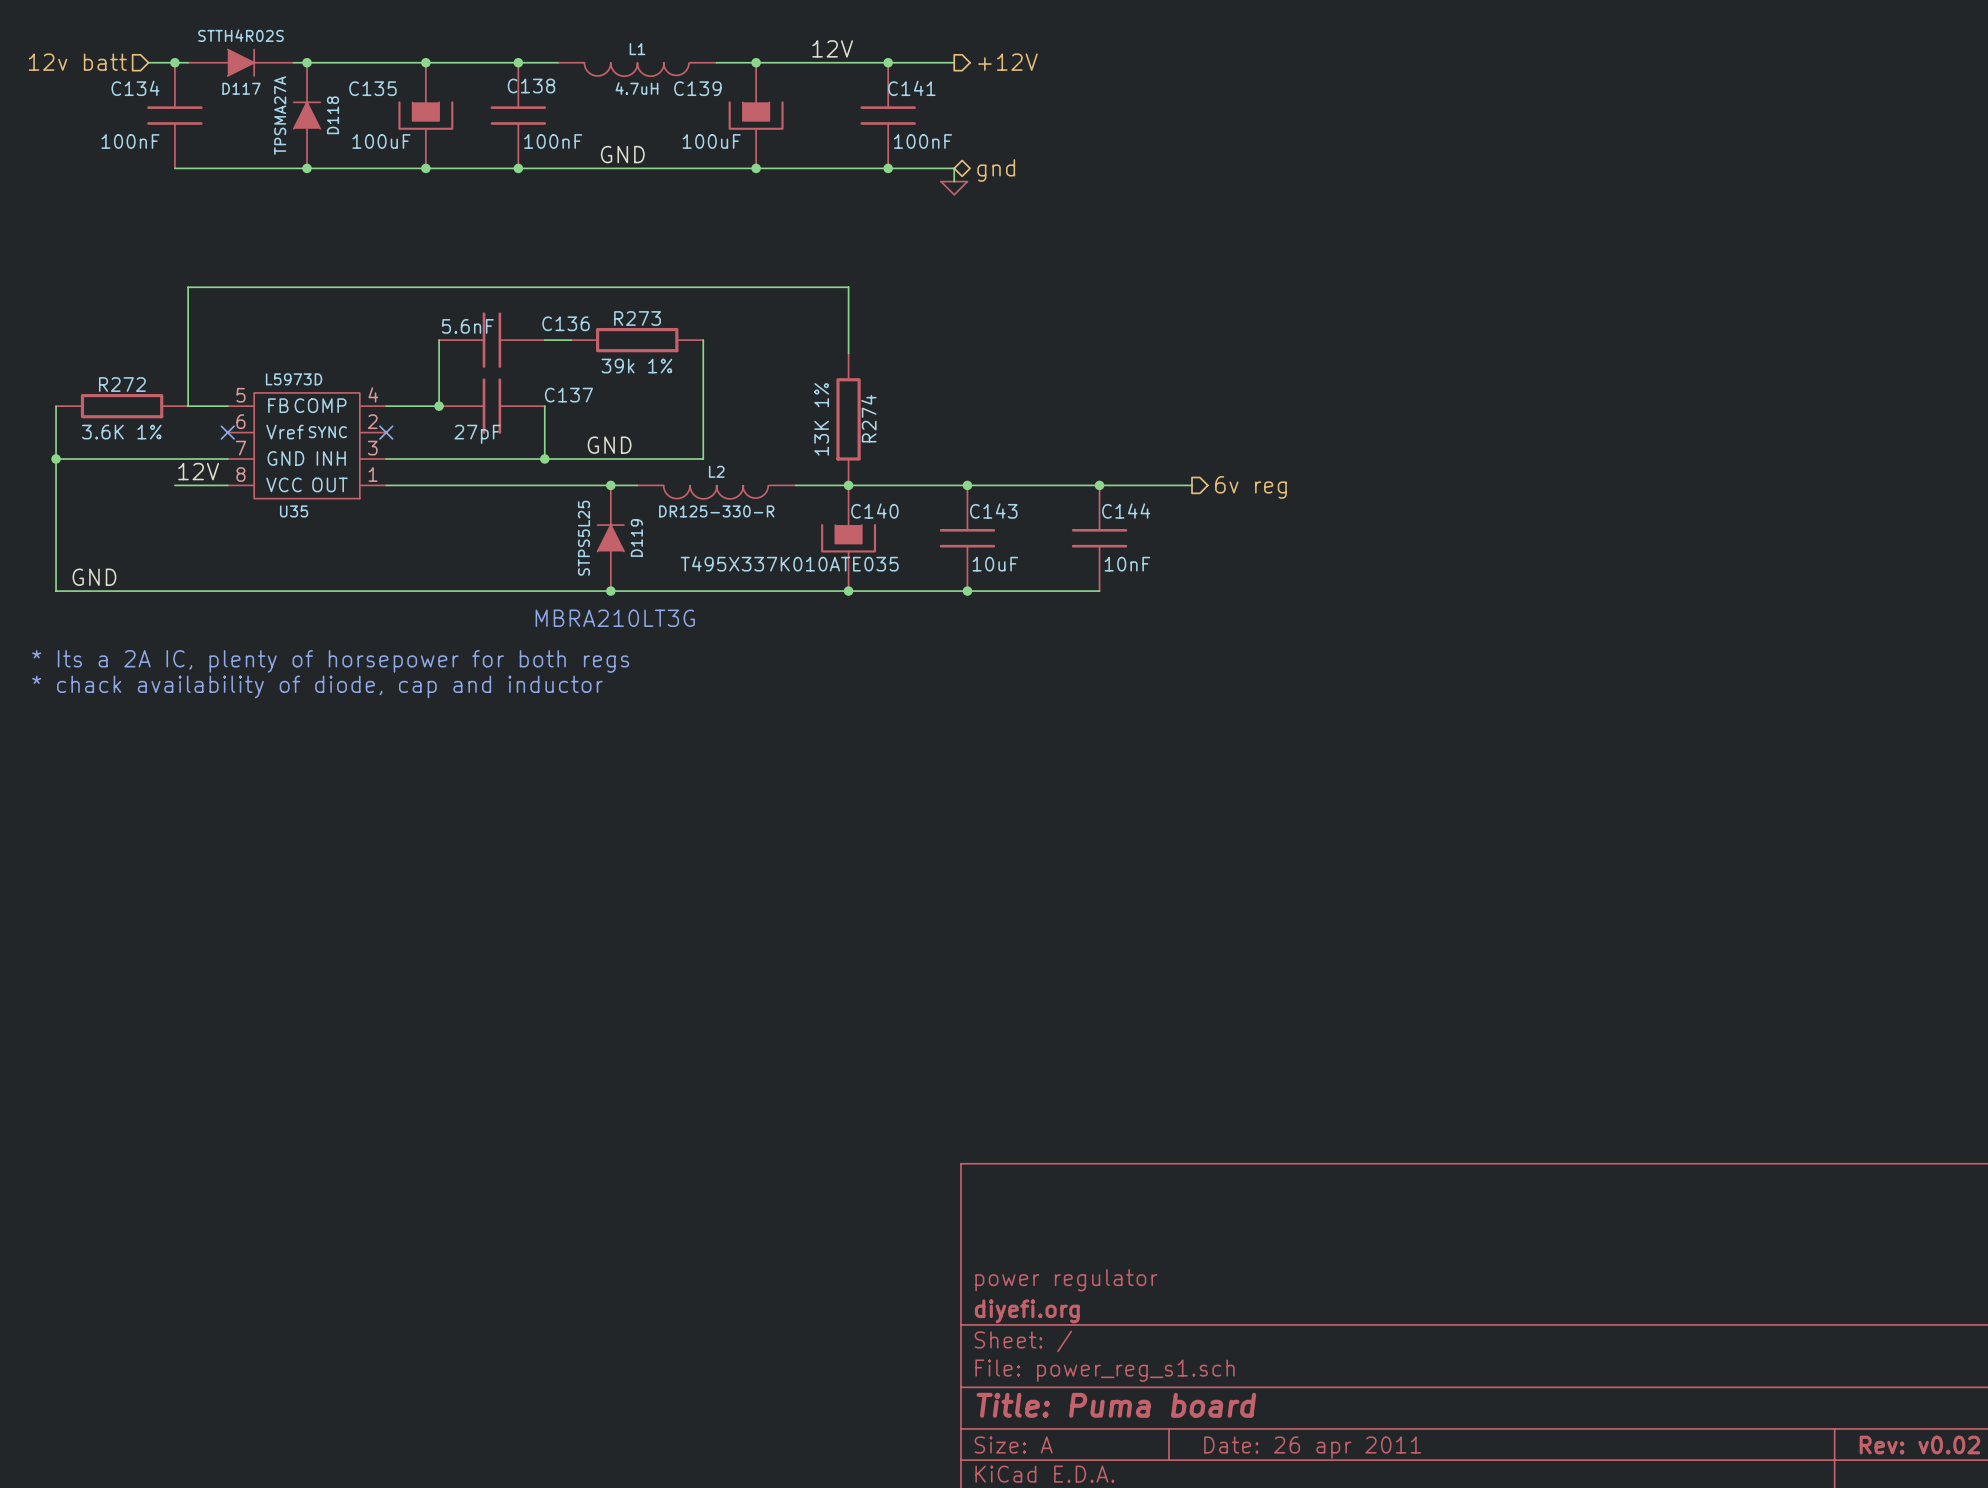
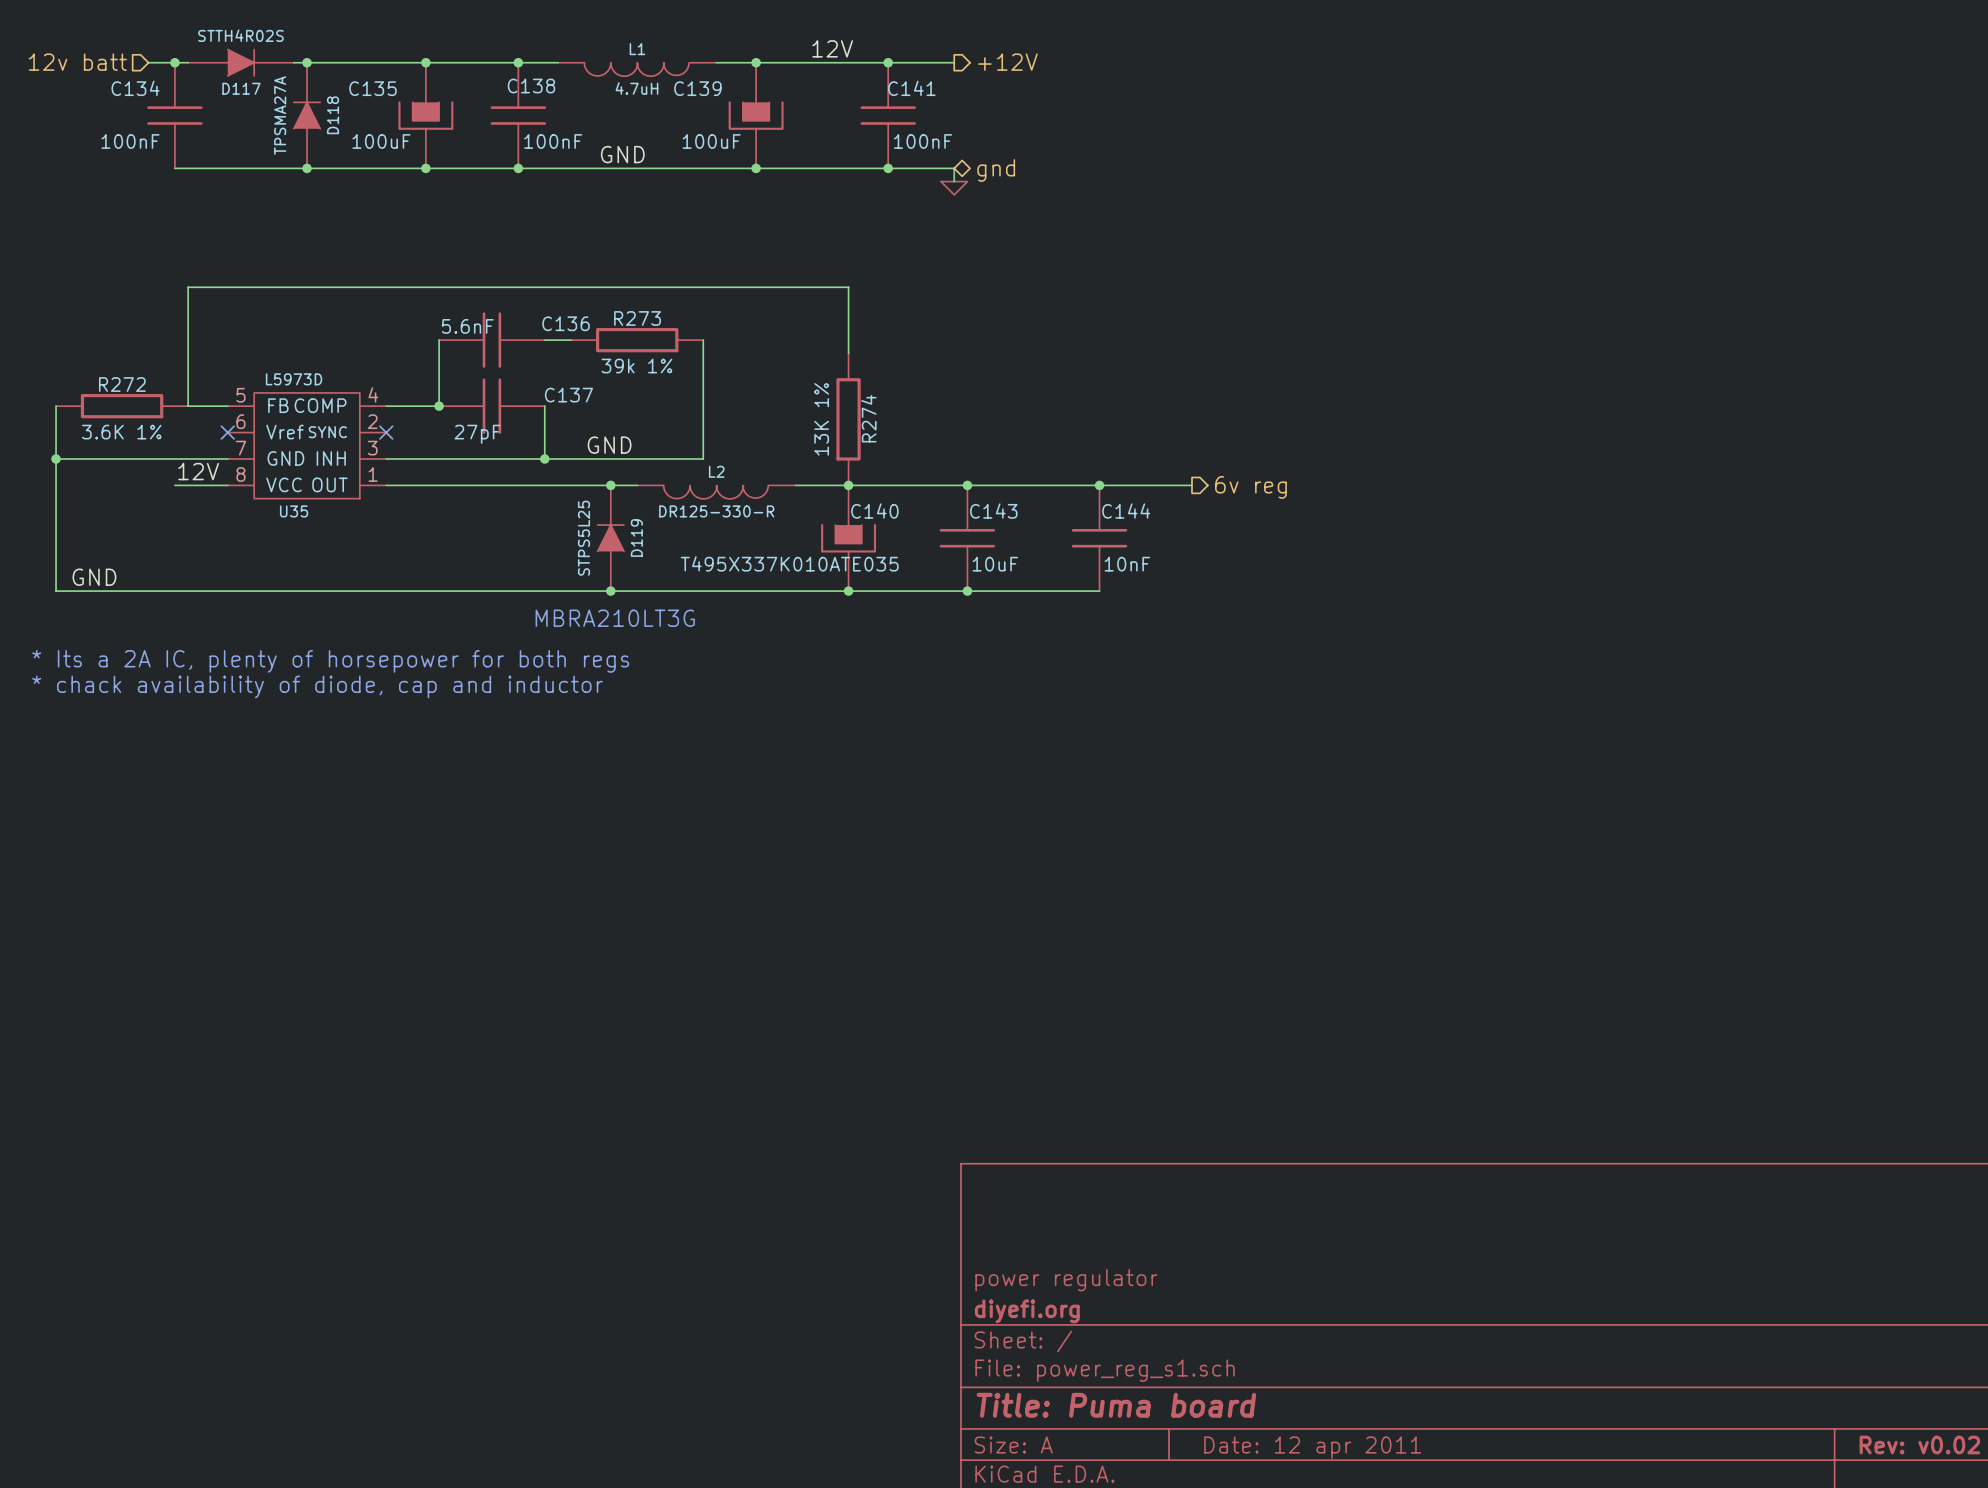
title block: Date: 26 apr 2011 (1312, 1447) -> Date: 12 apr 2011 (1312, 1447)

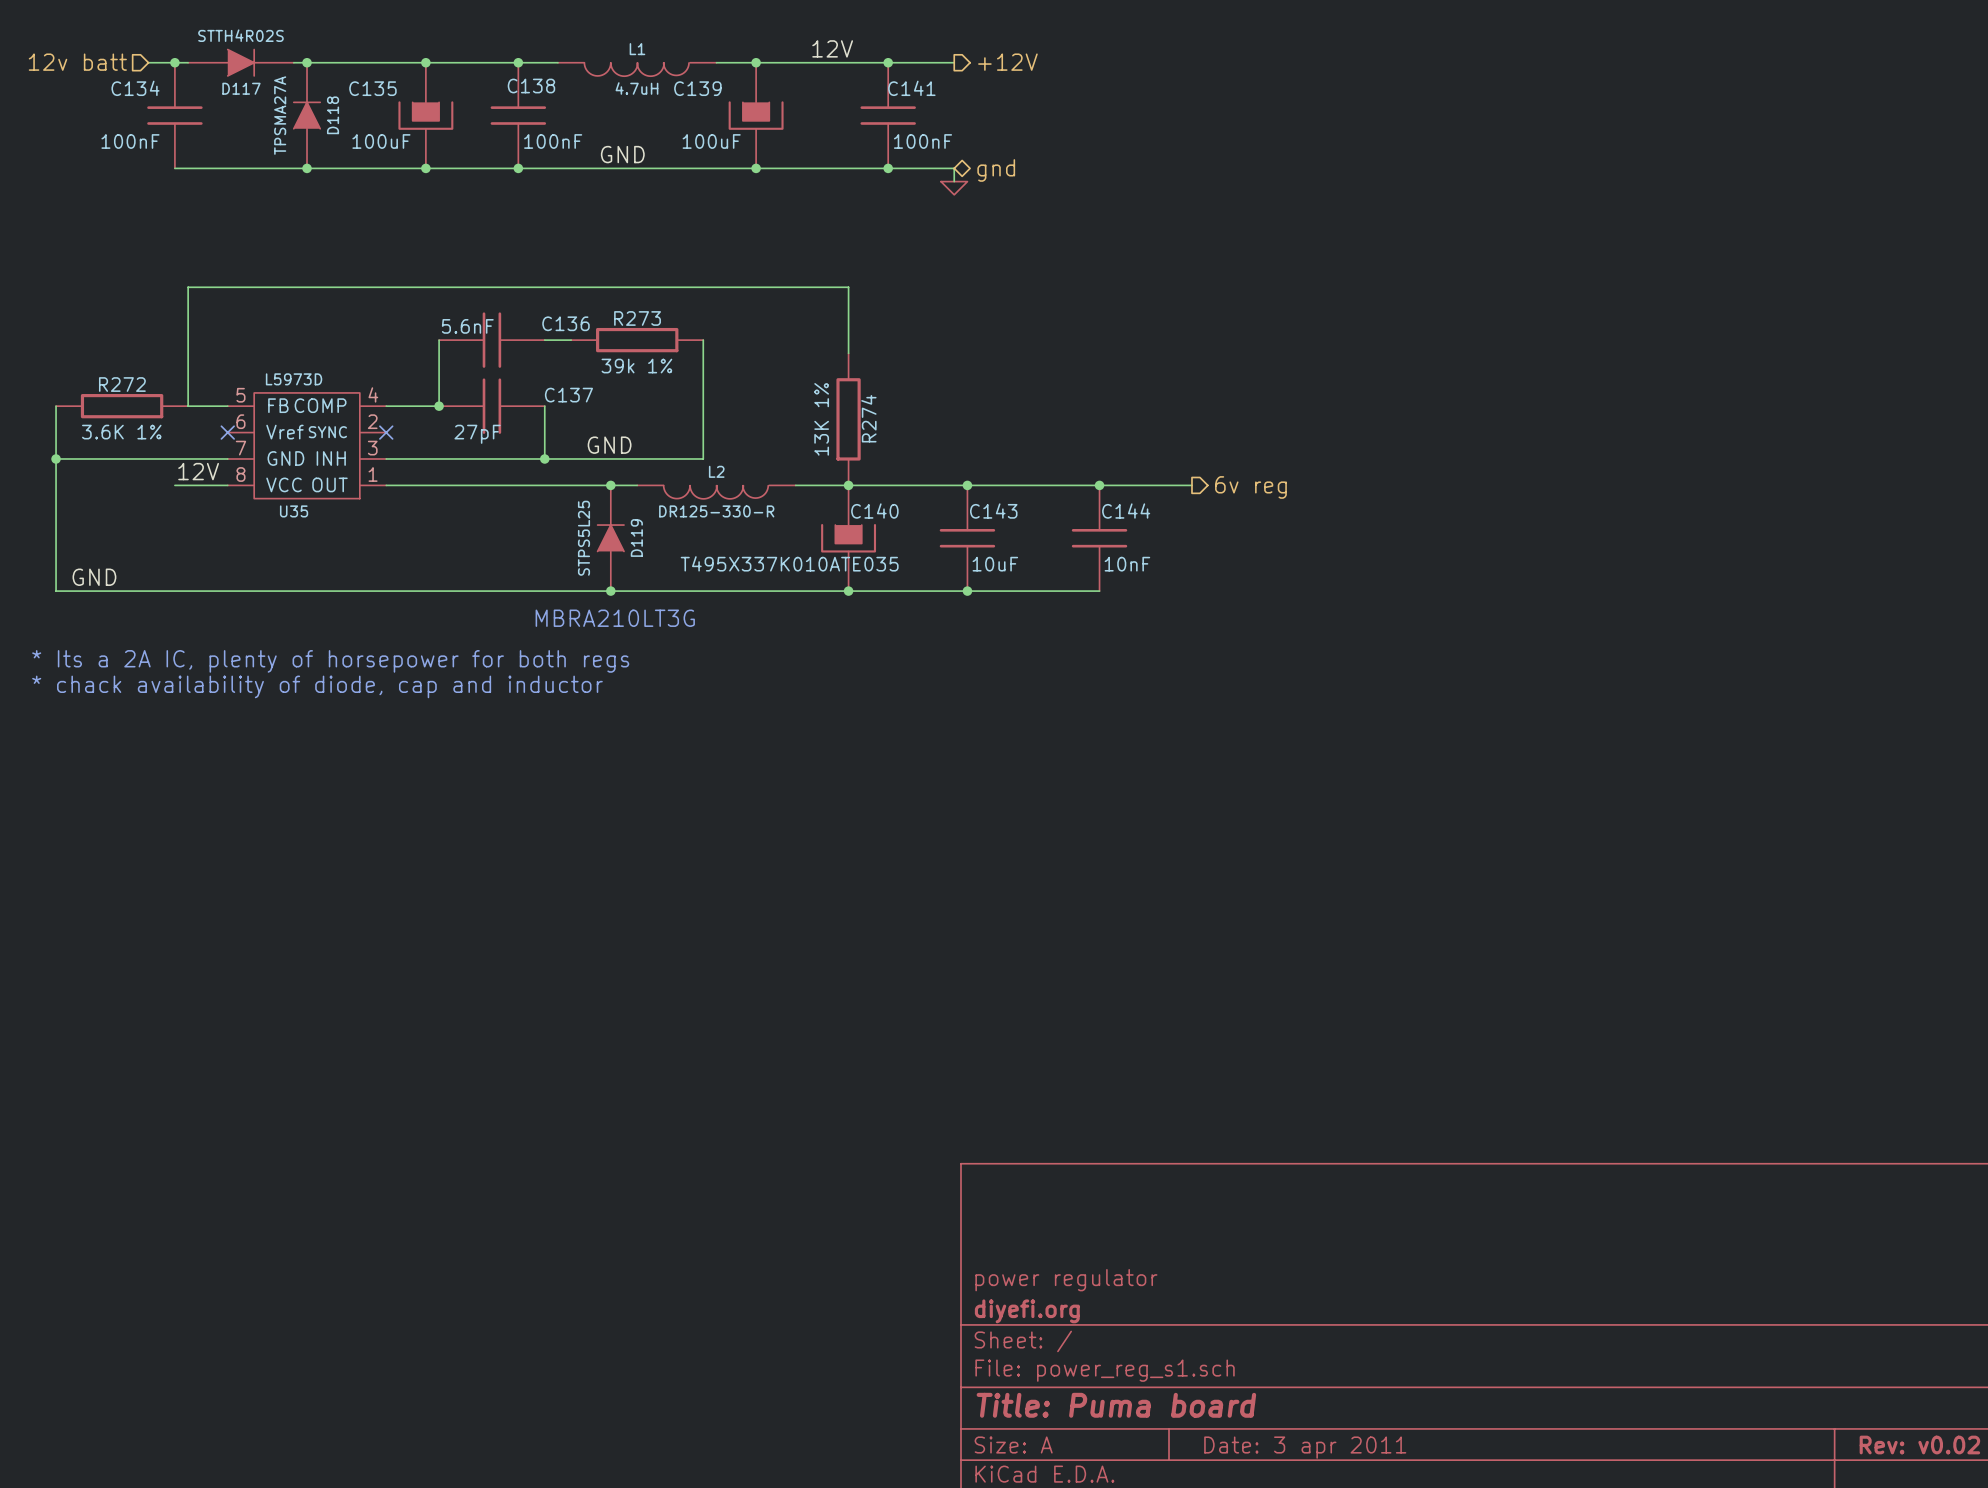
title block: Date: 12 apr 2011 (1312, 1447) -> Date: 3 apr 2011 (1305, 1447)

